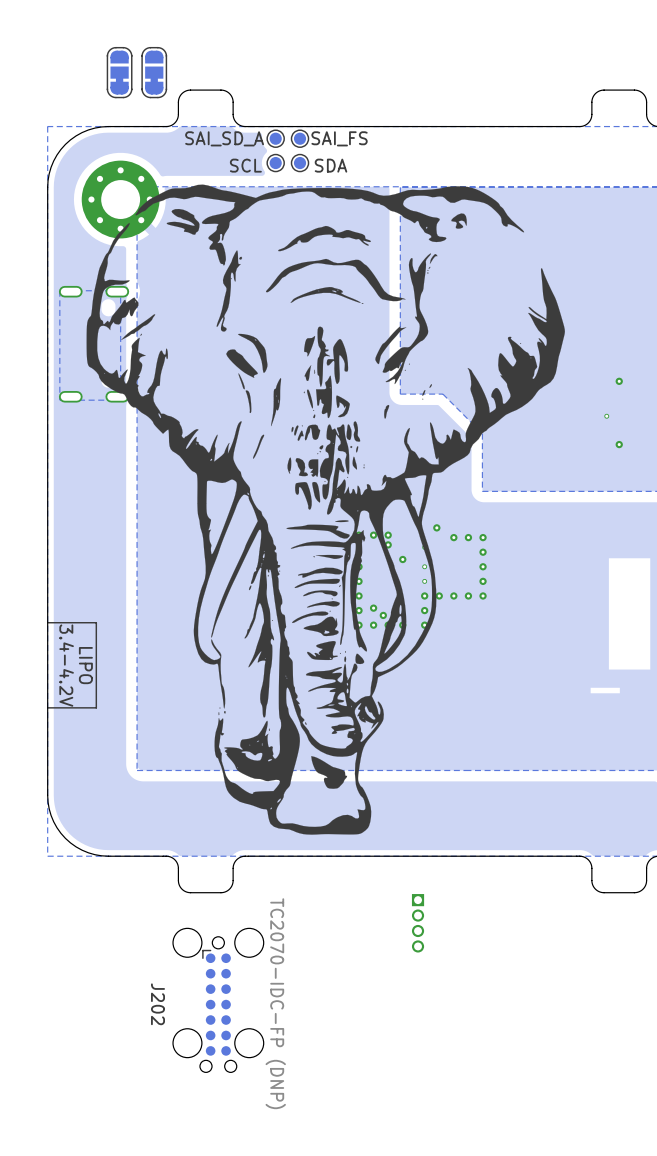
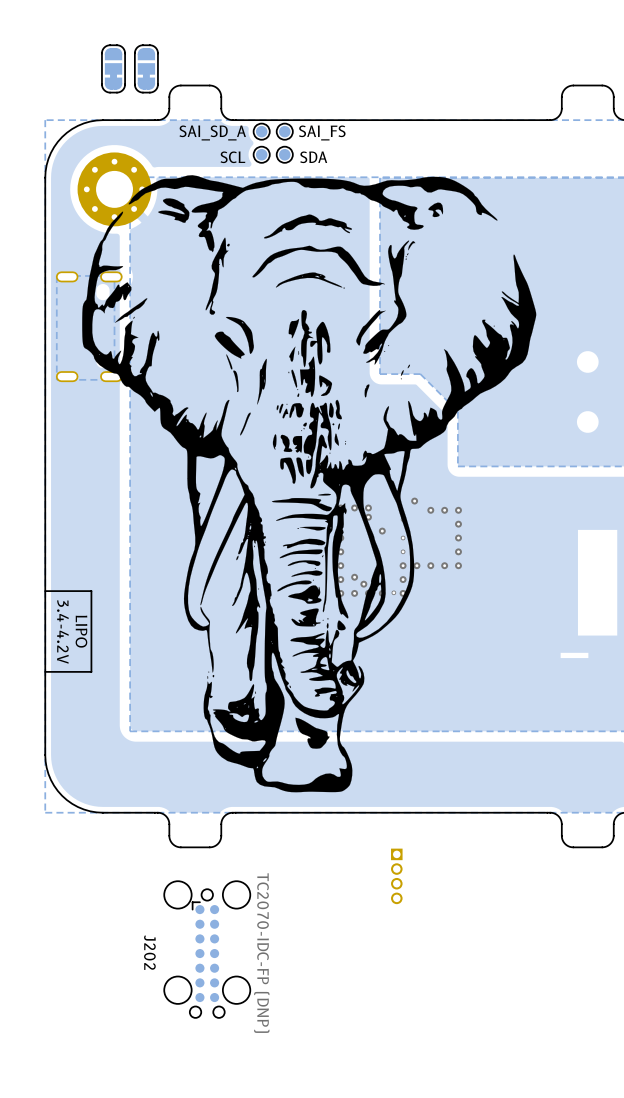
via: (619, 381) -> none
via: (606, 416) -> none
via: (619, 444) -> none
via: none -> (393, 592)

